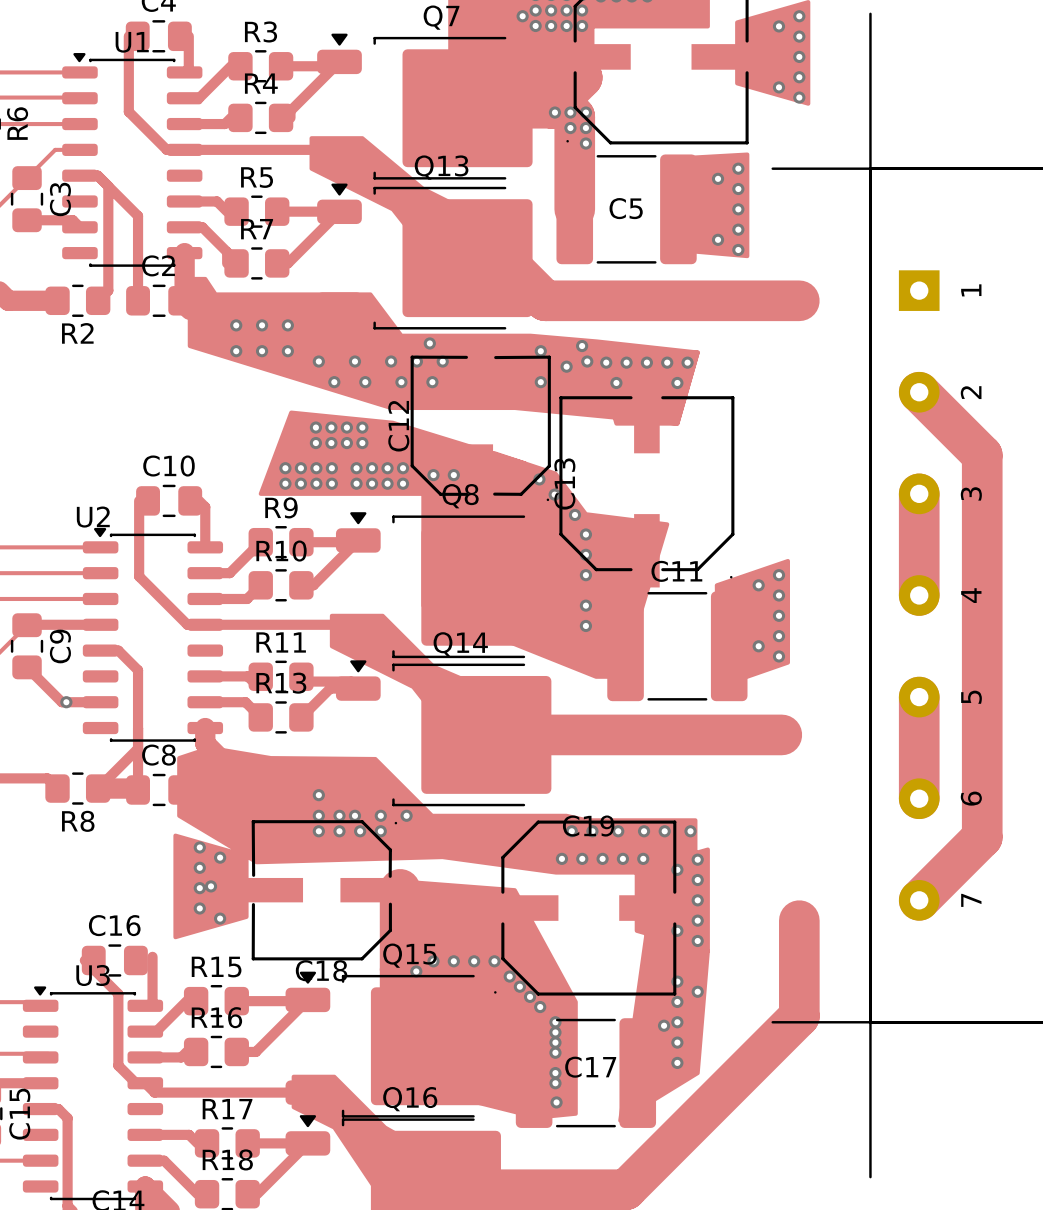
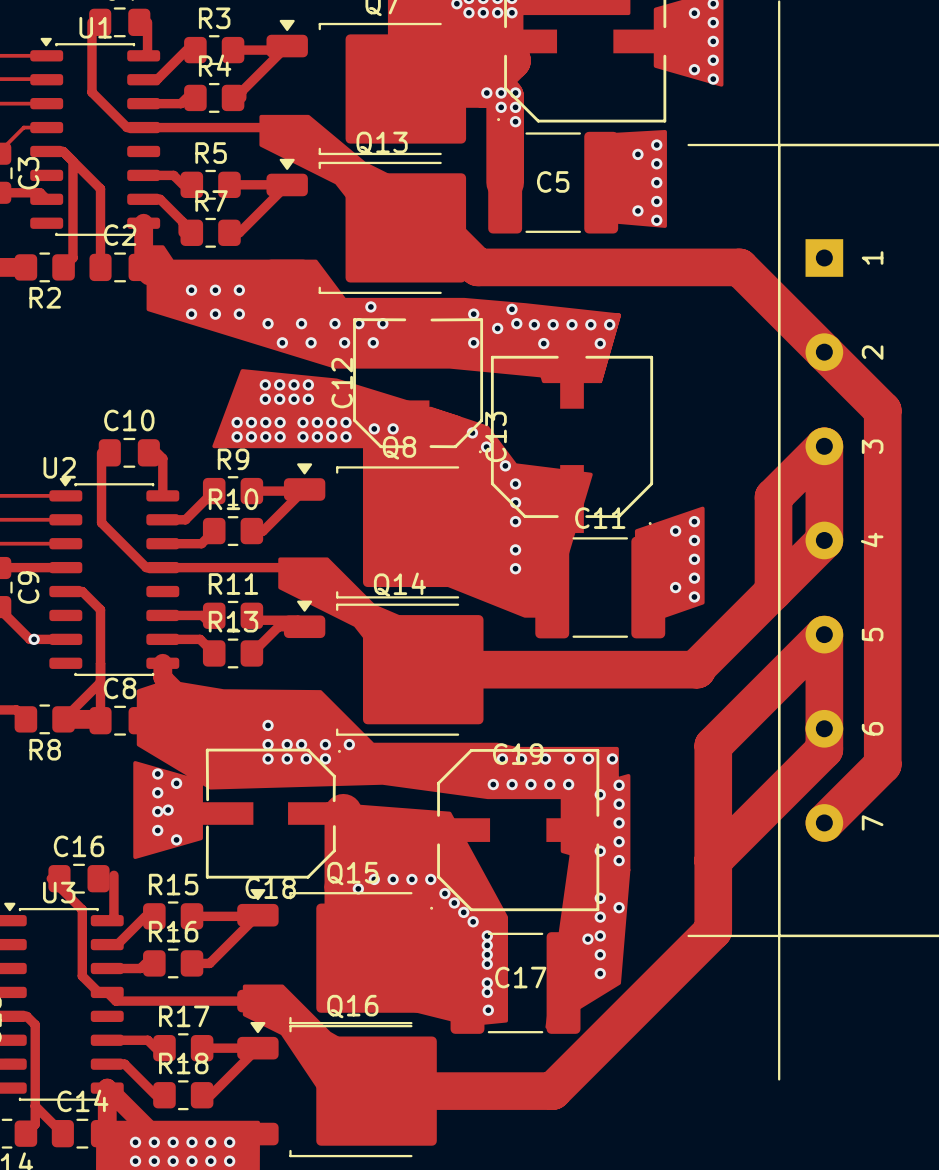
track: none -> (713, 267) (739, 267) (824, 352)
track: none -> (824, 446) (773, 497) (773, 591)
track: none -> (824, 540) (697, 669)
track: none -> (824, 634) (713, 745) (713, 841)
track: none -> (824, 728) (824, 749) (713, 860)

